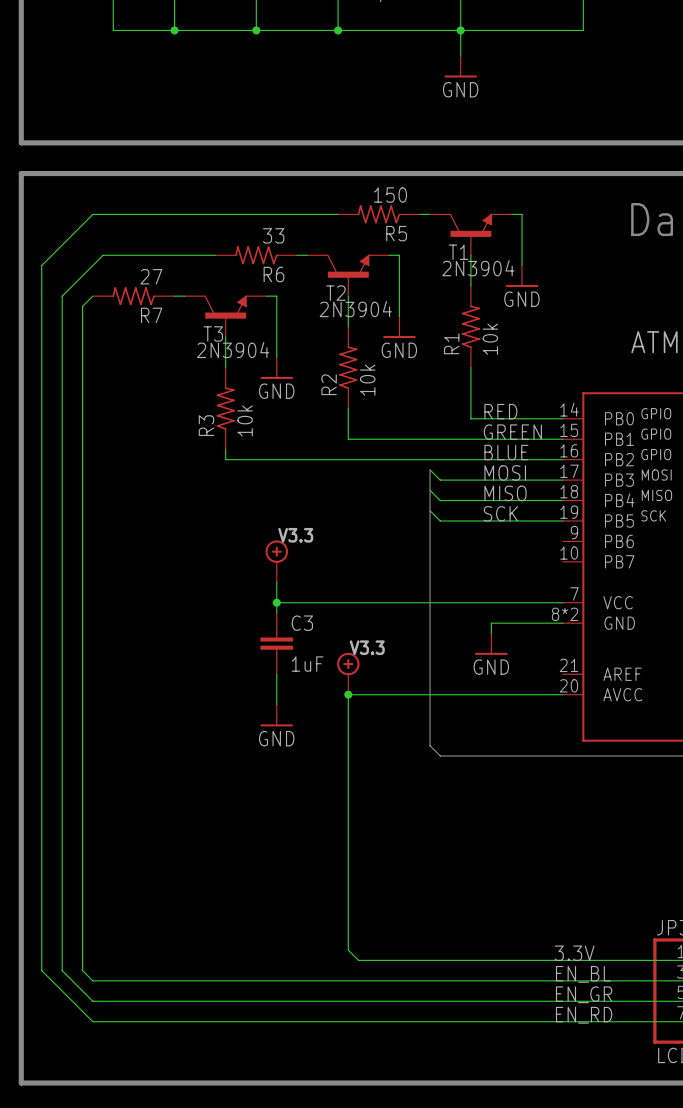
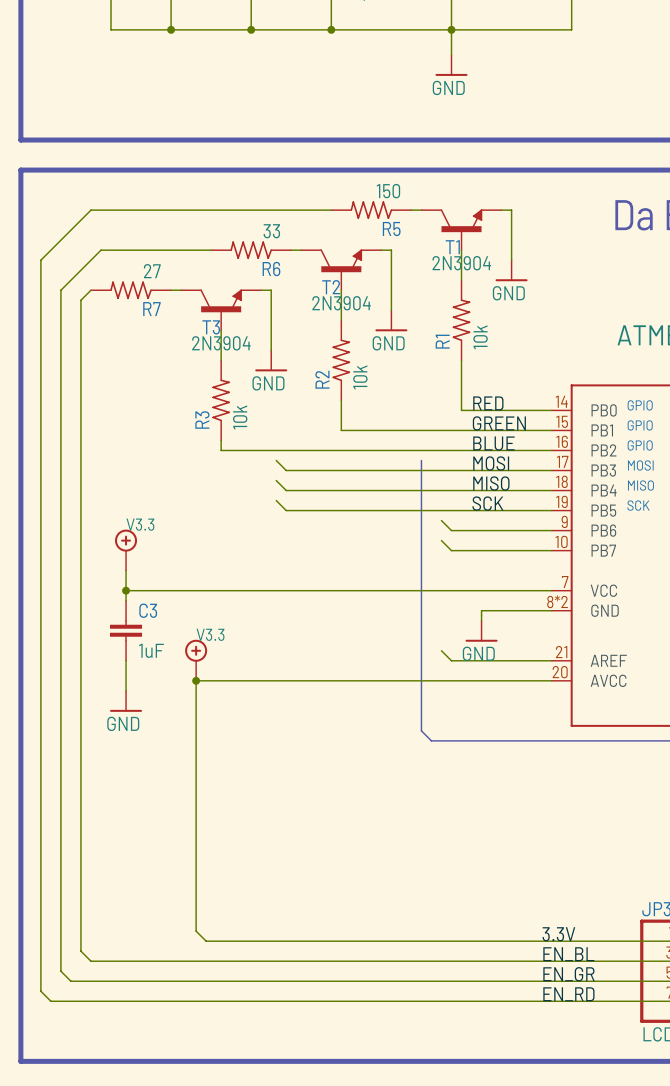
wire: (430, 469) (440, 480) -> (276, 460) (286, 470) (431, 470)
wire: (430, 490) (440, 500) -> (276, 480) (286, 490) (431, 490)
wire: (430, 510) (440, 520) -> (276, 500) (286, 510) (431, 510)
wire: none -> (441, 520) (451, 530) (551, 530)
wire: none -> (441, 540) (451, 550) (551, 550)
power symbol: none -> V3.3 (126, 550)
power symbol: V3.3 (276, 561) -> none
wire: (276, 582) (276, 612) -> (126, 570) (126, 600)
wire: none -> (126, 590) (271, 590)
junction: none -> (126, 590)
junction: (276, 602) -> none
C3 position: (276, 643) -> (126, 630)
wire: none -> (441, 650) (451, 660) (551, 660)
power symbol: none -> V3.3 (196, 660)
power symbol: V3.3 (348, 673) -> none
wire: (276, 674) (276, 704) -> (126, 660) (126, 690)
junction: none -> (196, 680)
wire: (348, 694) (348, 950) (358, 960) -> (341, 680) (196, 680) (196, 931) (206, 941) (351, 941)
junction: (348, 694) -> none
power symbol position: GND (276, 715) -> GND (126, 701)
wire: (41, 970) (62, 991) -> (60, 951) (60, 971)
wire: none -> (40, 951) (40, 991) (50, 1001) (90, 1001)
wire: (62, 970) (92, 1001) -> none
wire: (72, 1001) (92, 1021) -> (70, 981) (90, 981)

